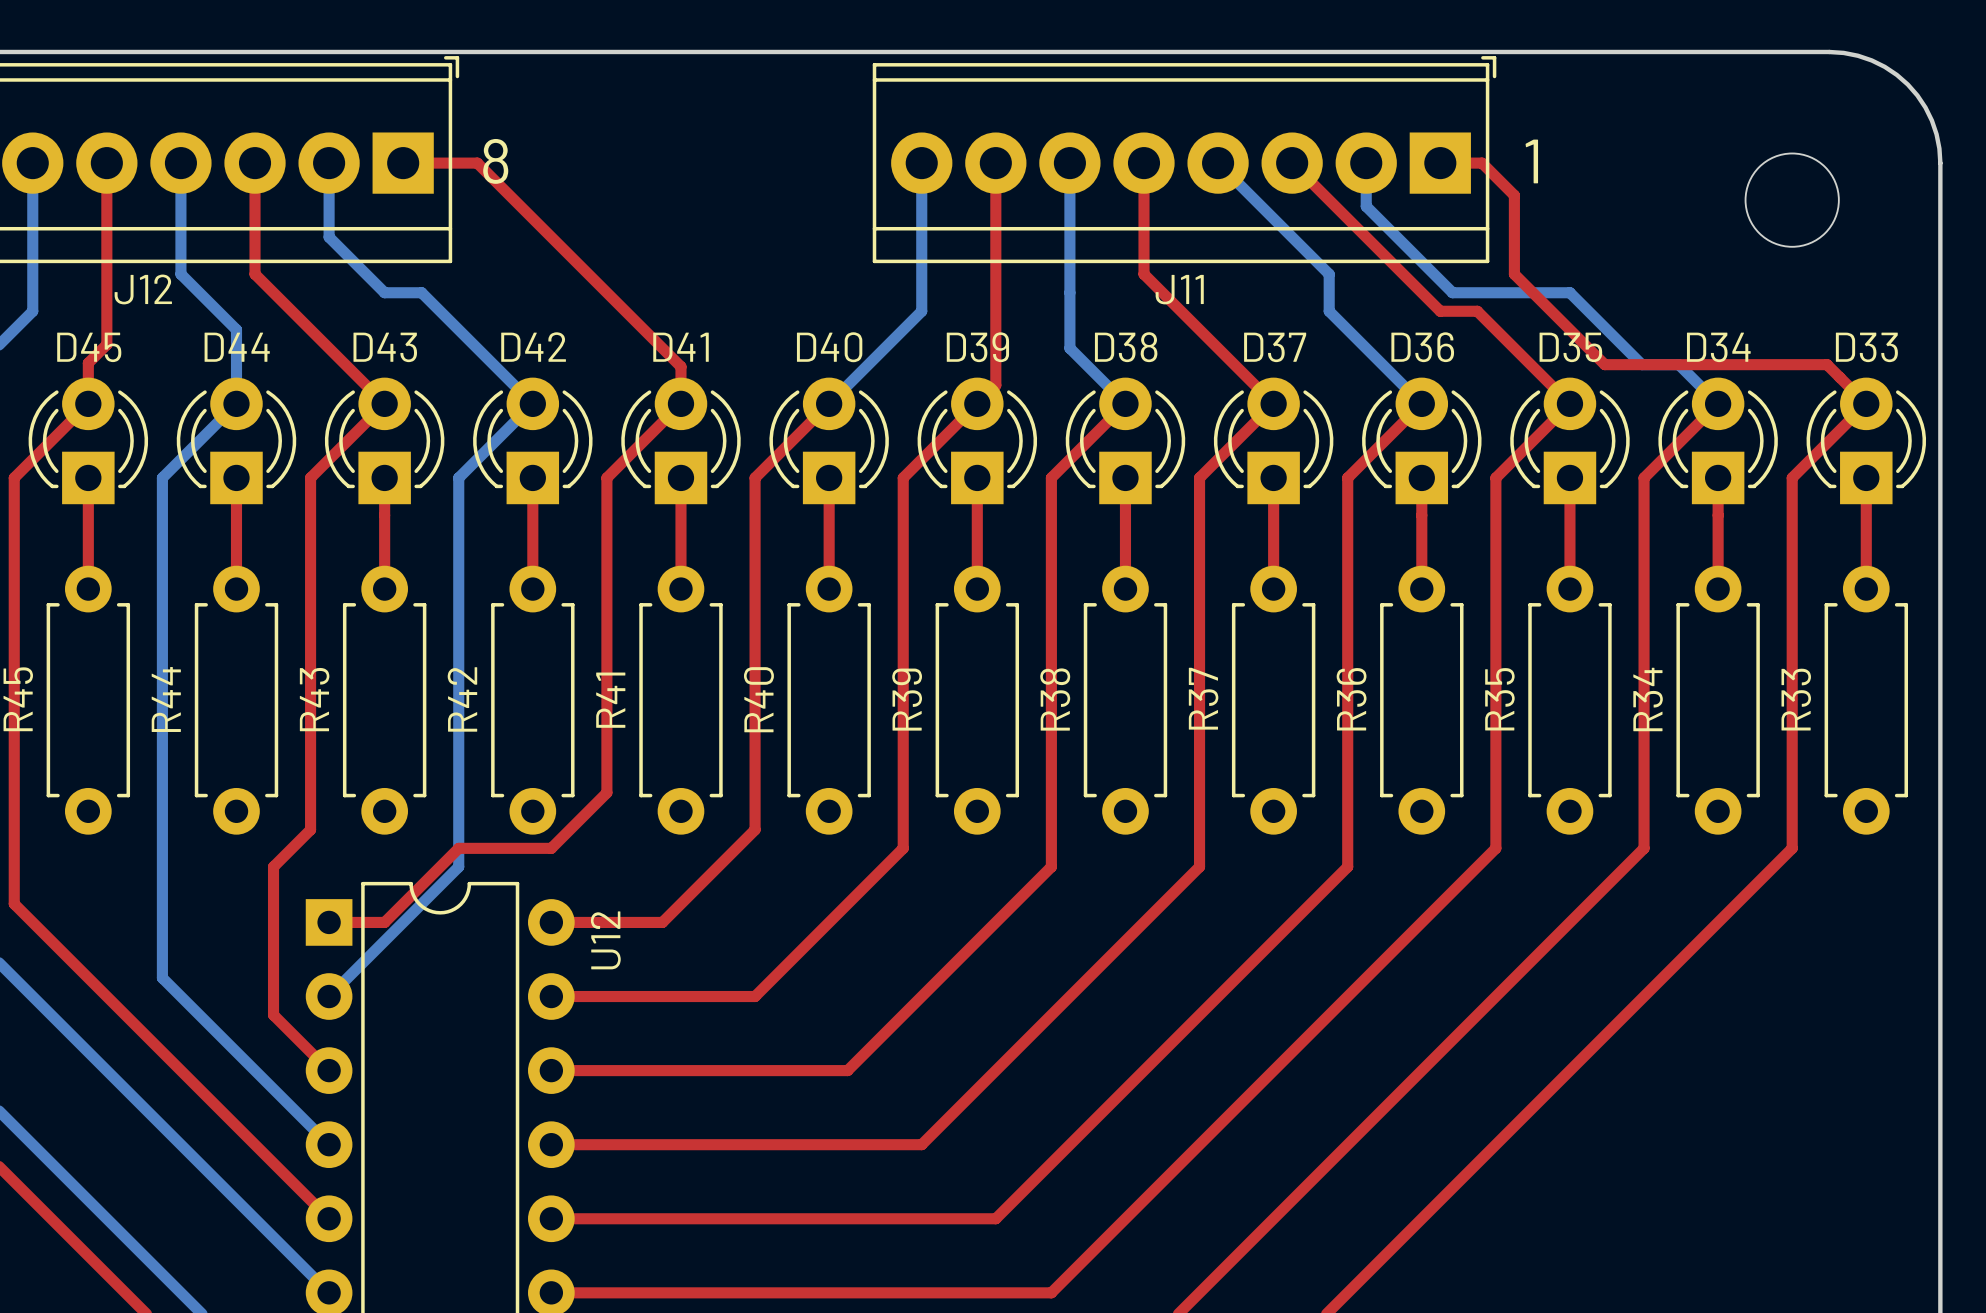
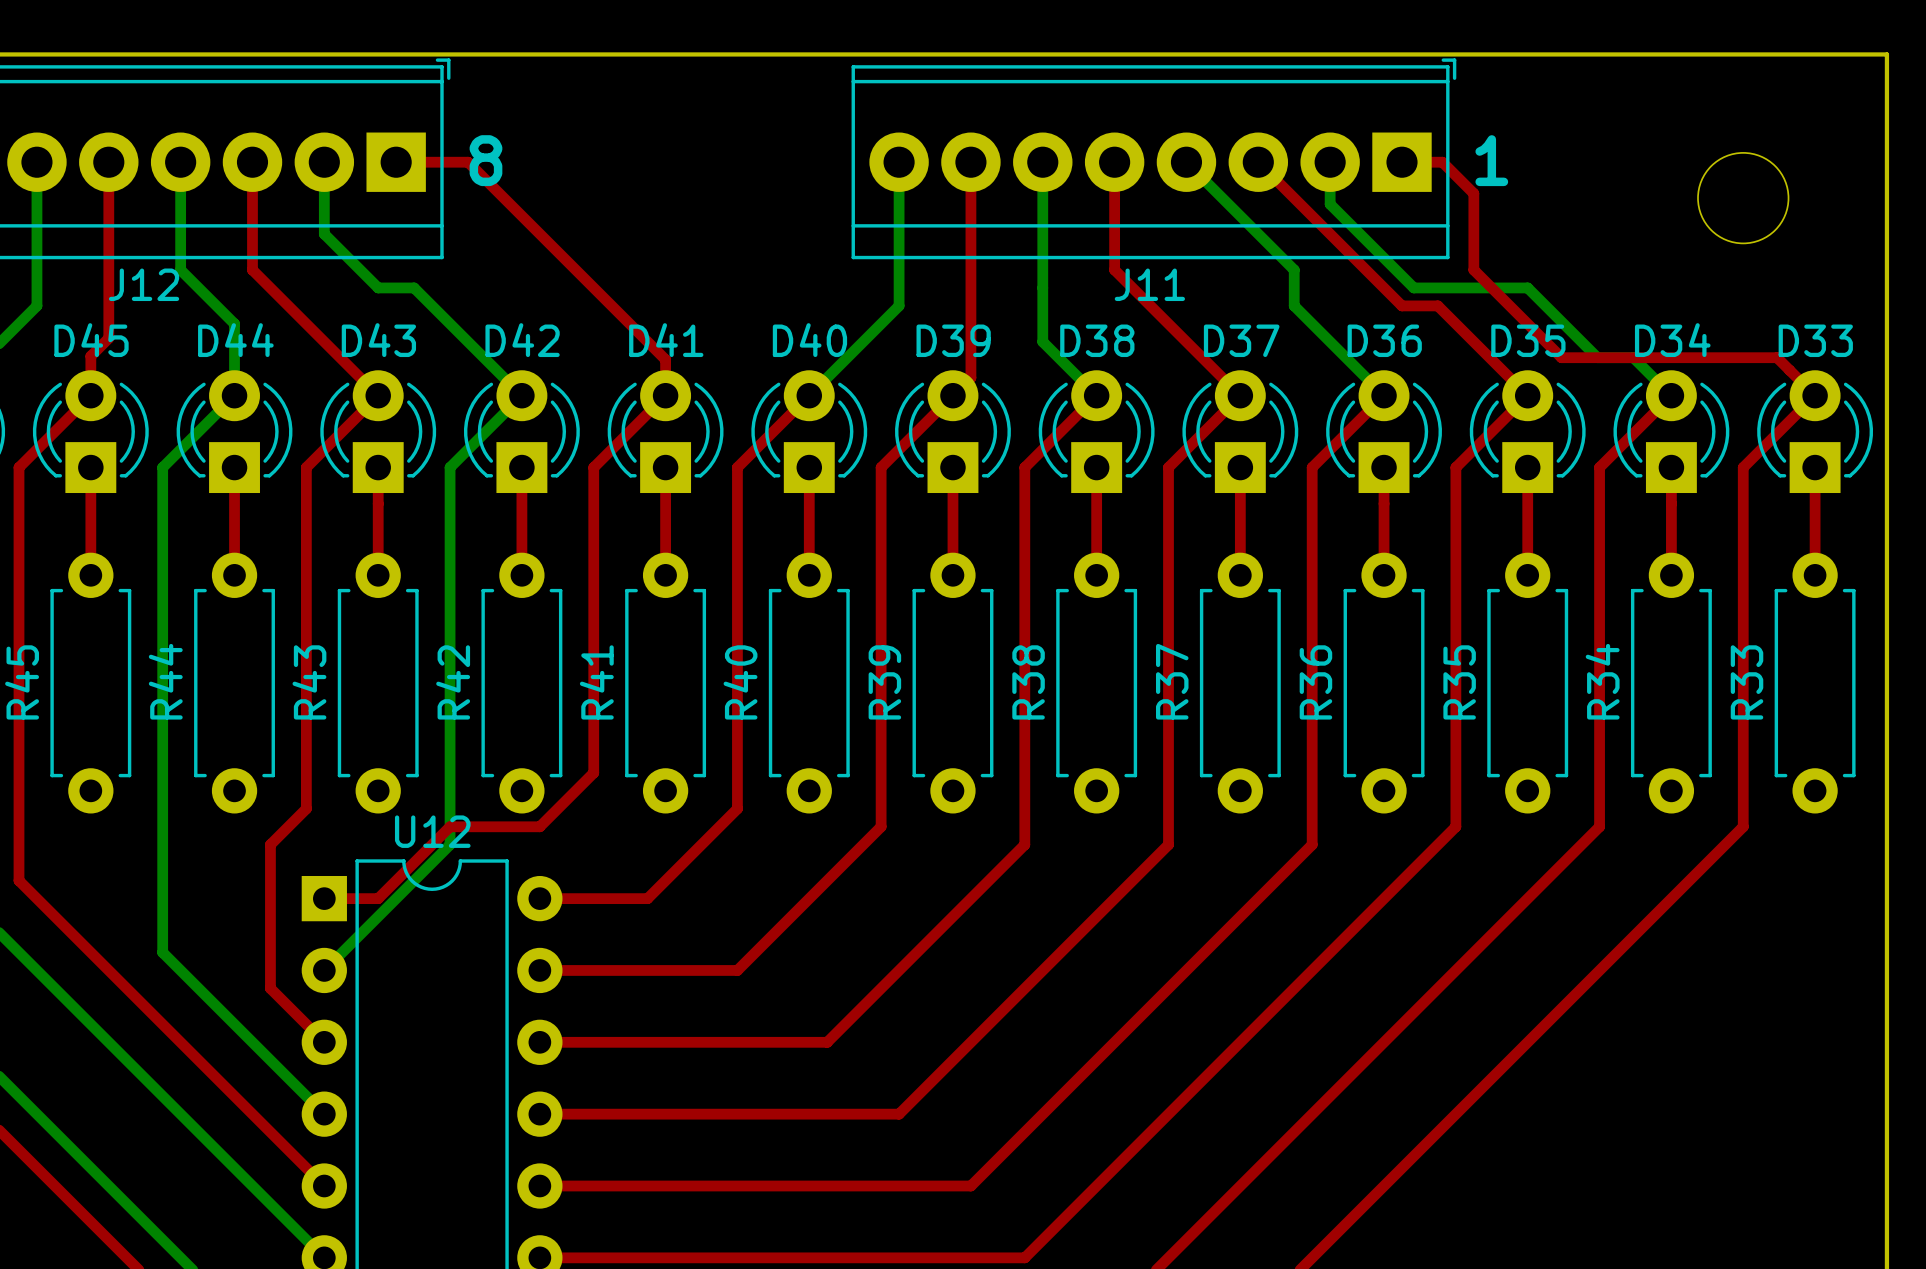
board edge: (1829, 51) (1843, 52) (1871, 60) (1884, 66) (1907, 84) (1925, 107) (1931, 120) (1939, 148) (1940, 163) -> (1779, 54) (1886, 54) (1886, 162)
U12 name rotation: 0° (605, 940) -> 90° clockwise (432, 831)
U12 name position: U12 (605, 940) -> U12 (432, 831)

